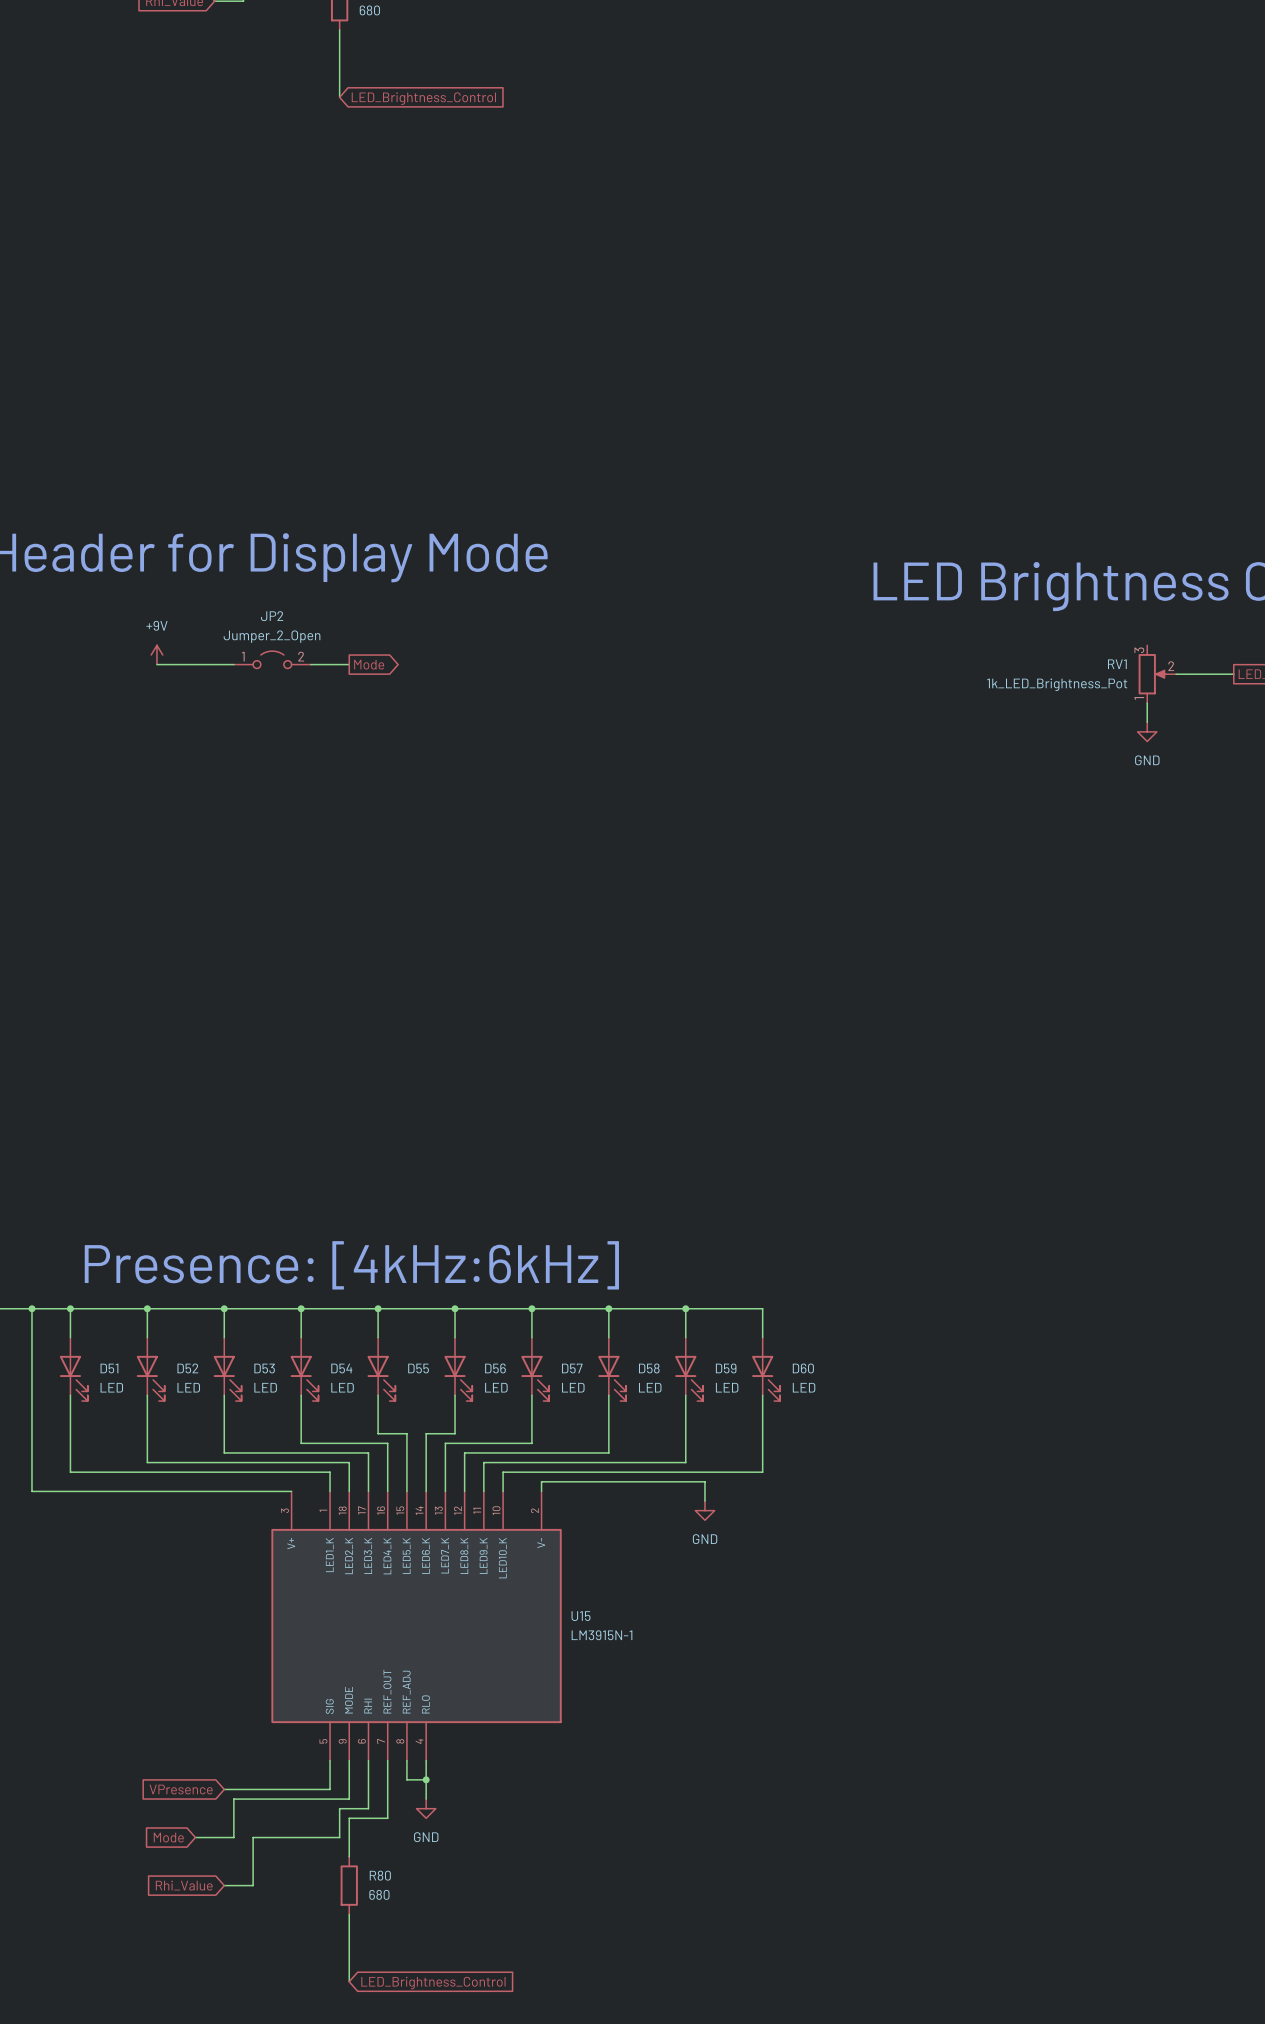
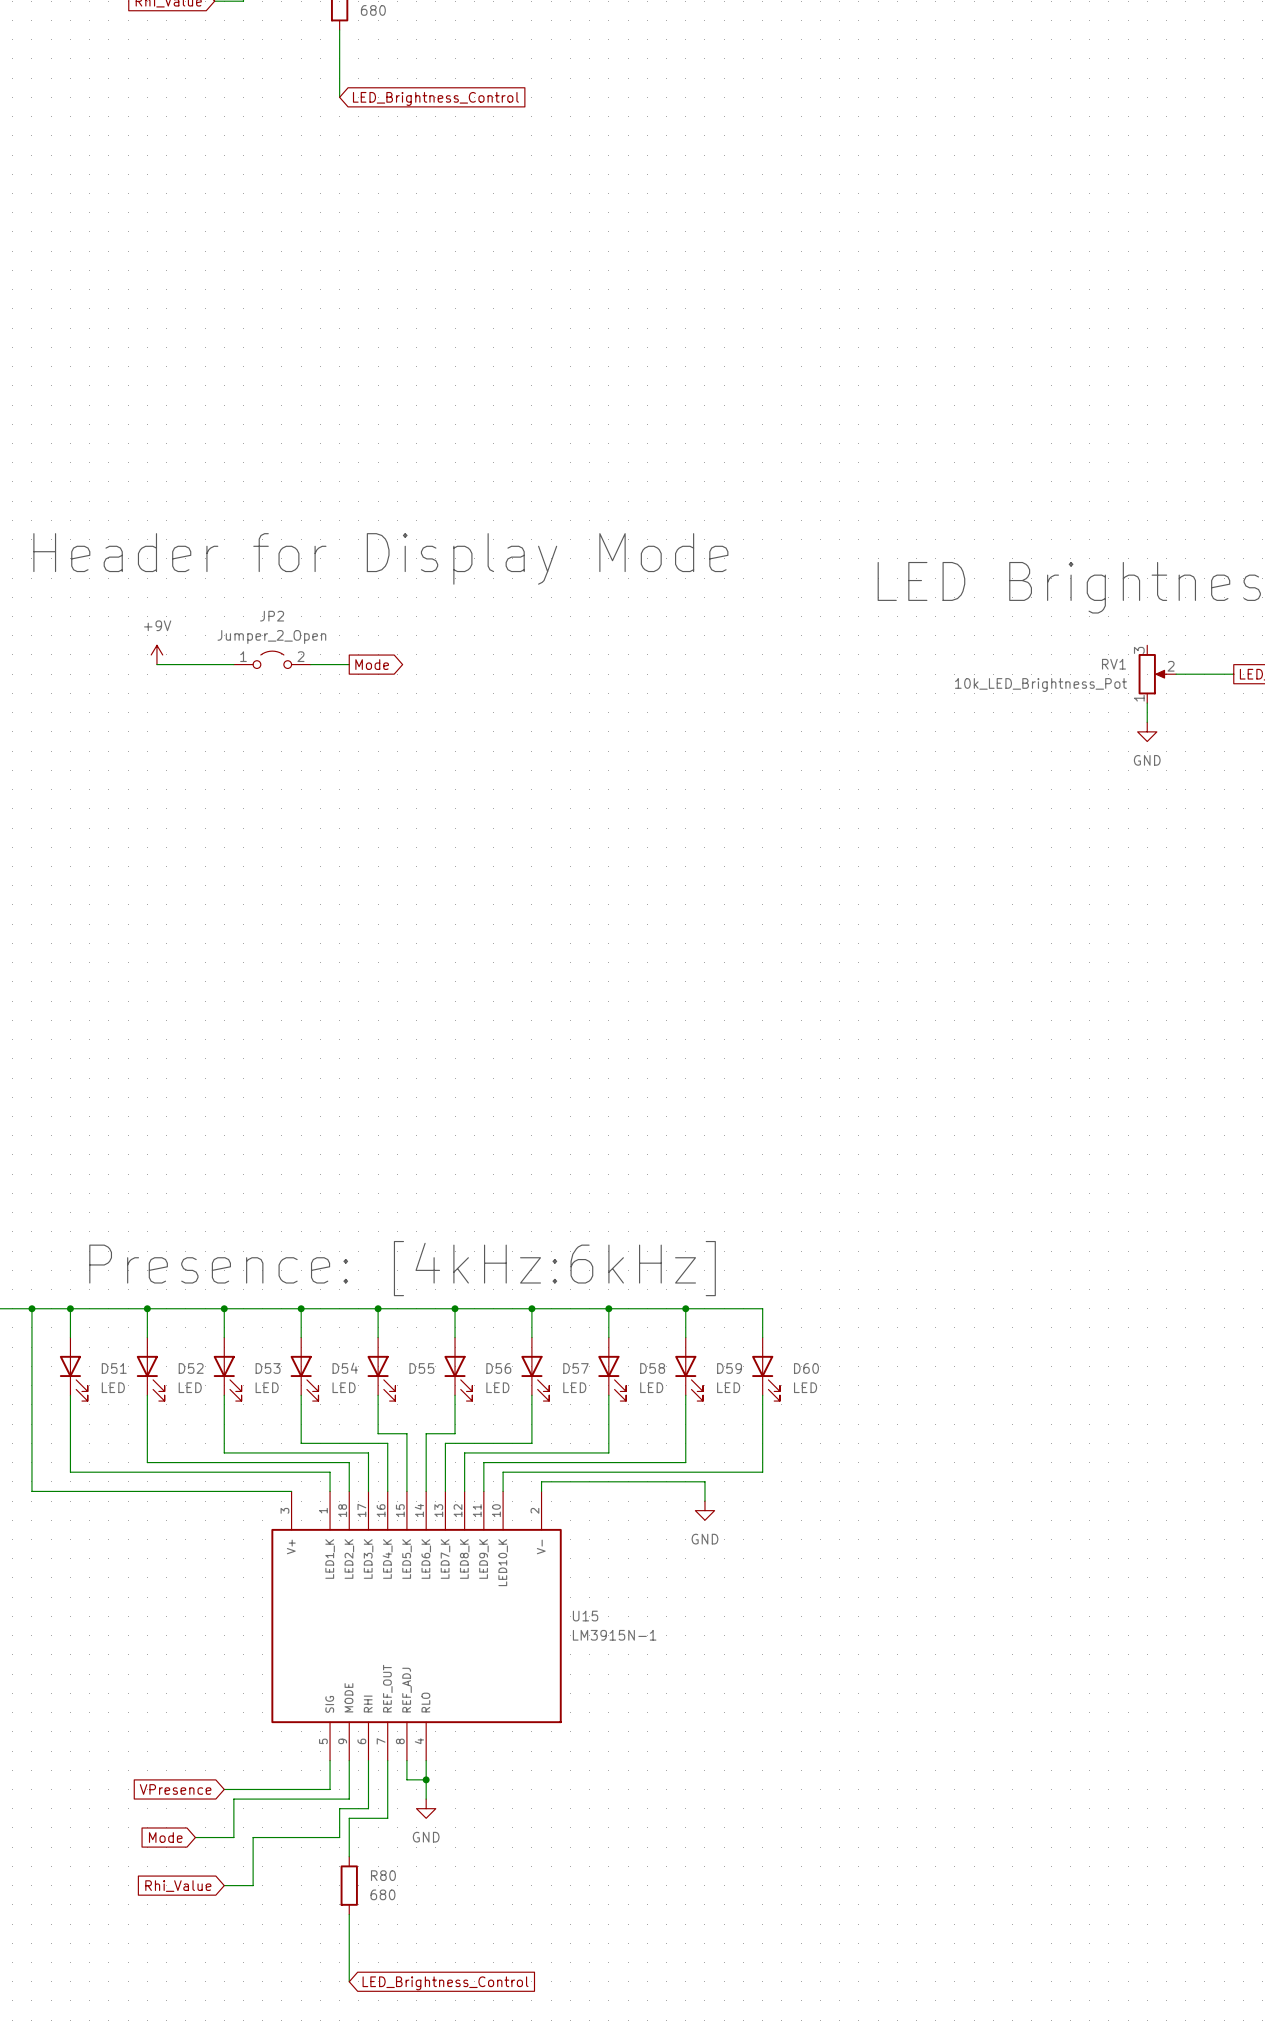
RV1 value: 1k_LED_Brightness_Pot (1057, 684) -> 10k_LED_Brightness_Pot (1040, 685)

